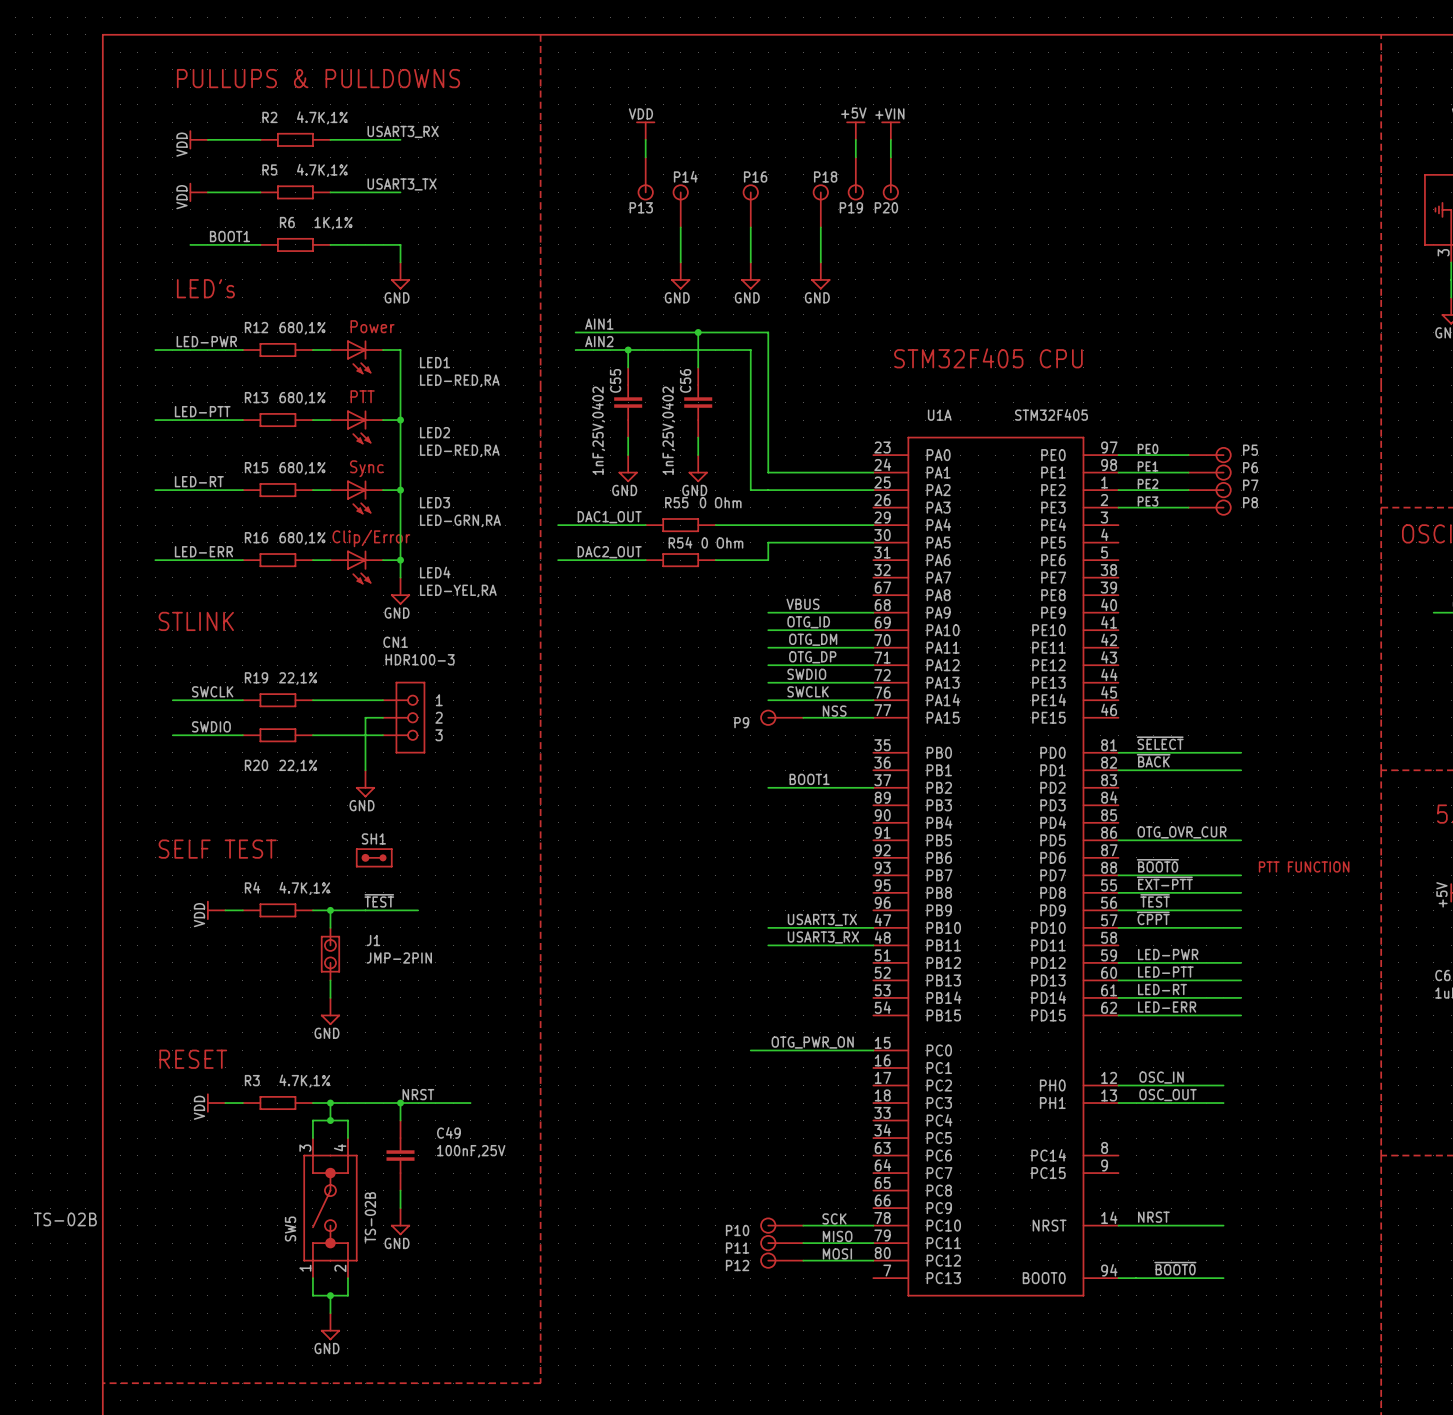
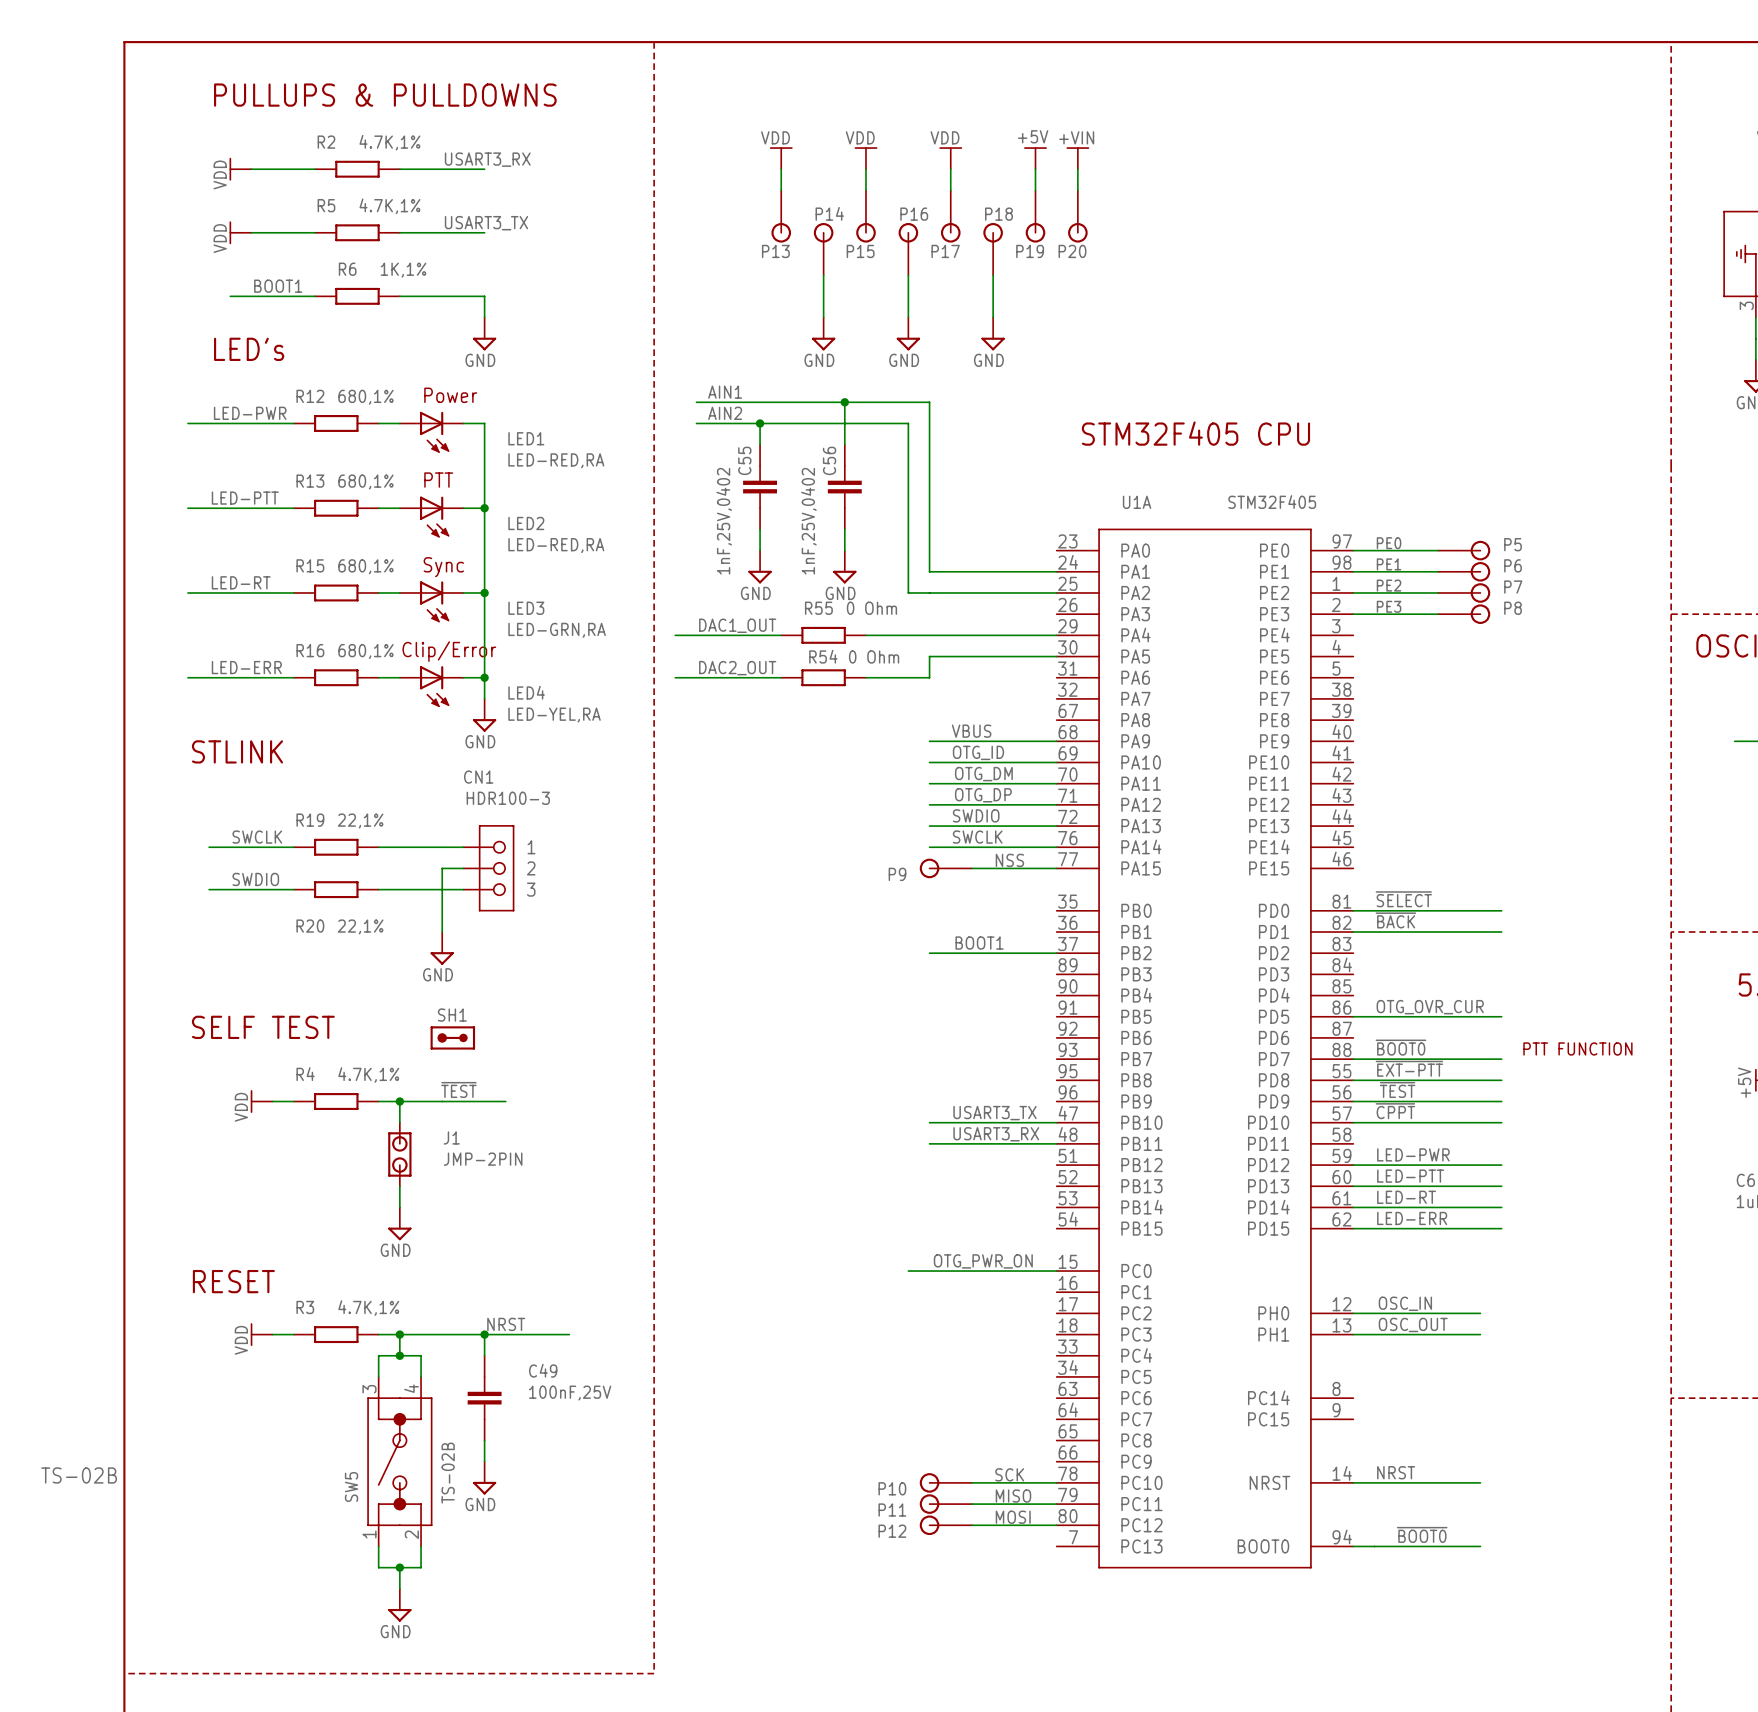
power symbol: none -> VDD (865, 158)
power symbol: none -> VDD (950, 158)
wire: none -> (865, 169) (865, 190)
wire: none -> (950, 169) (950, 190)
P15: none -> (865, 216)
P17: none -> (950, 216)

